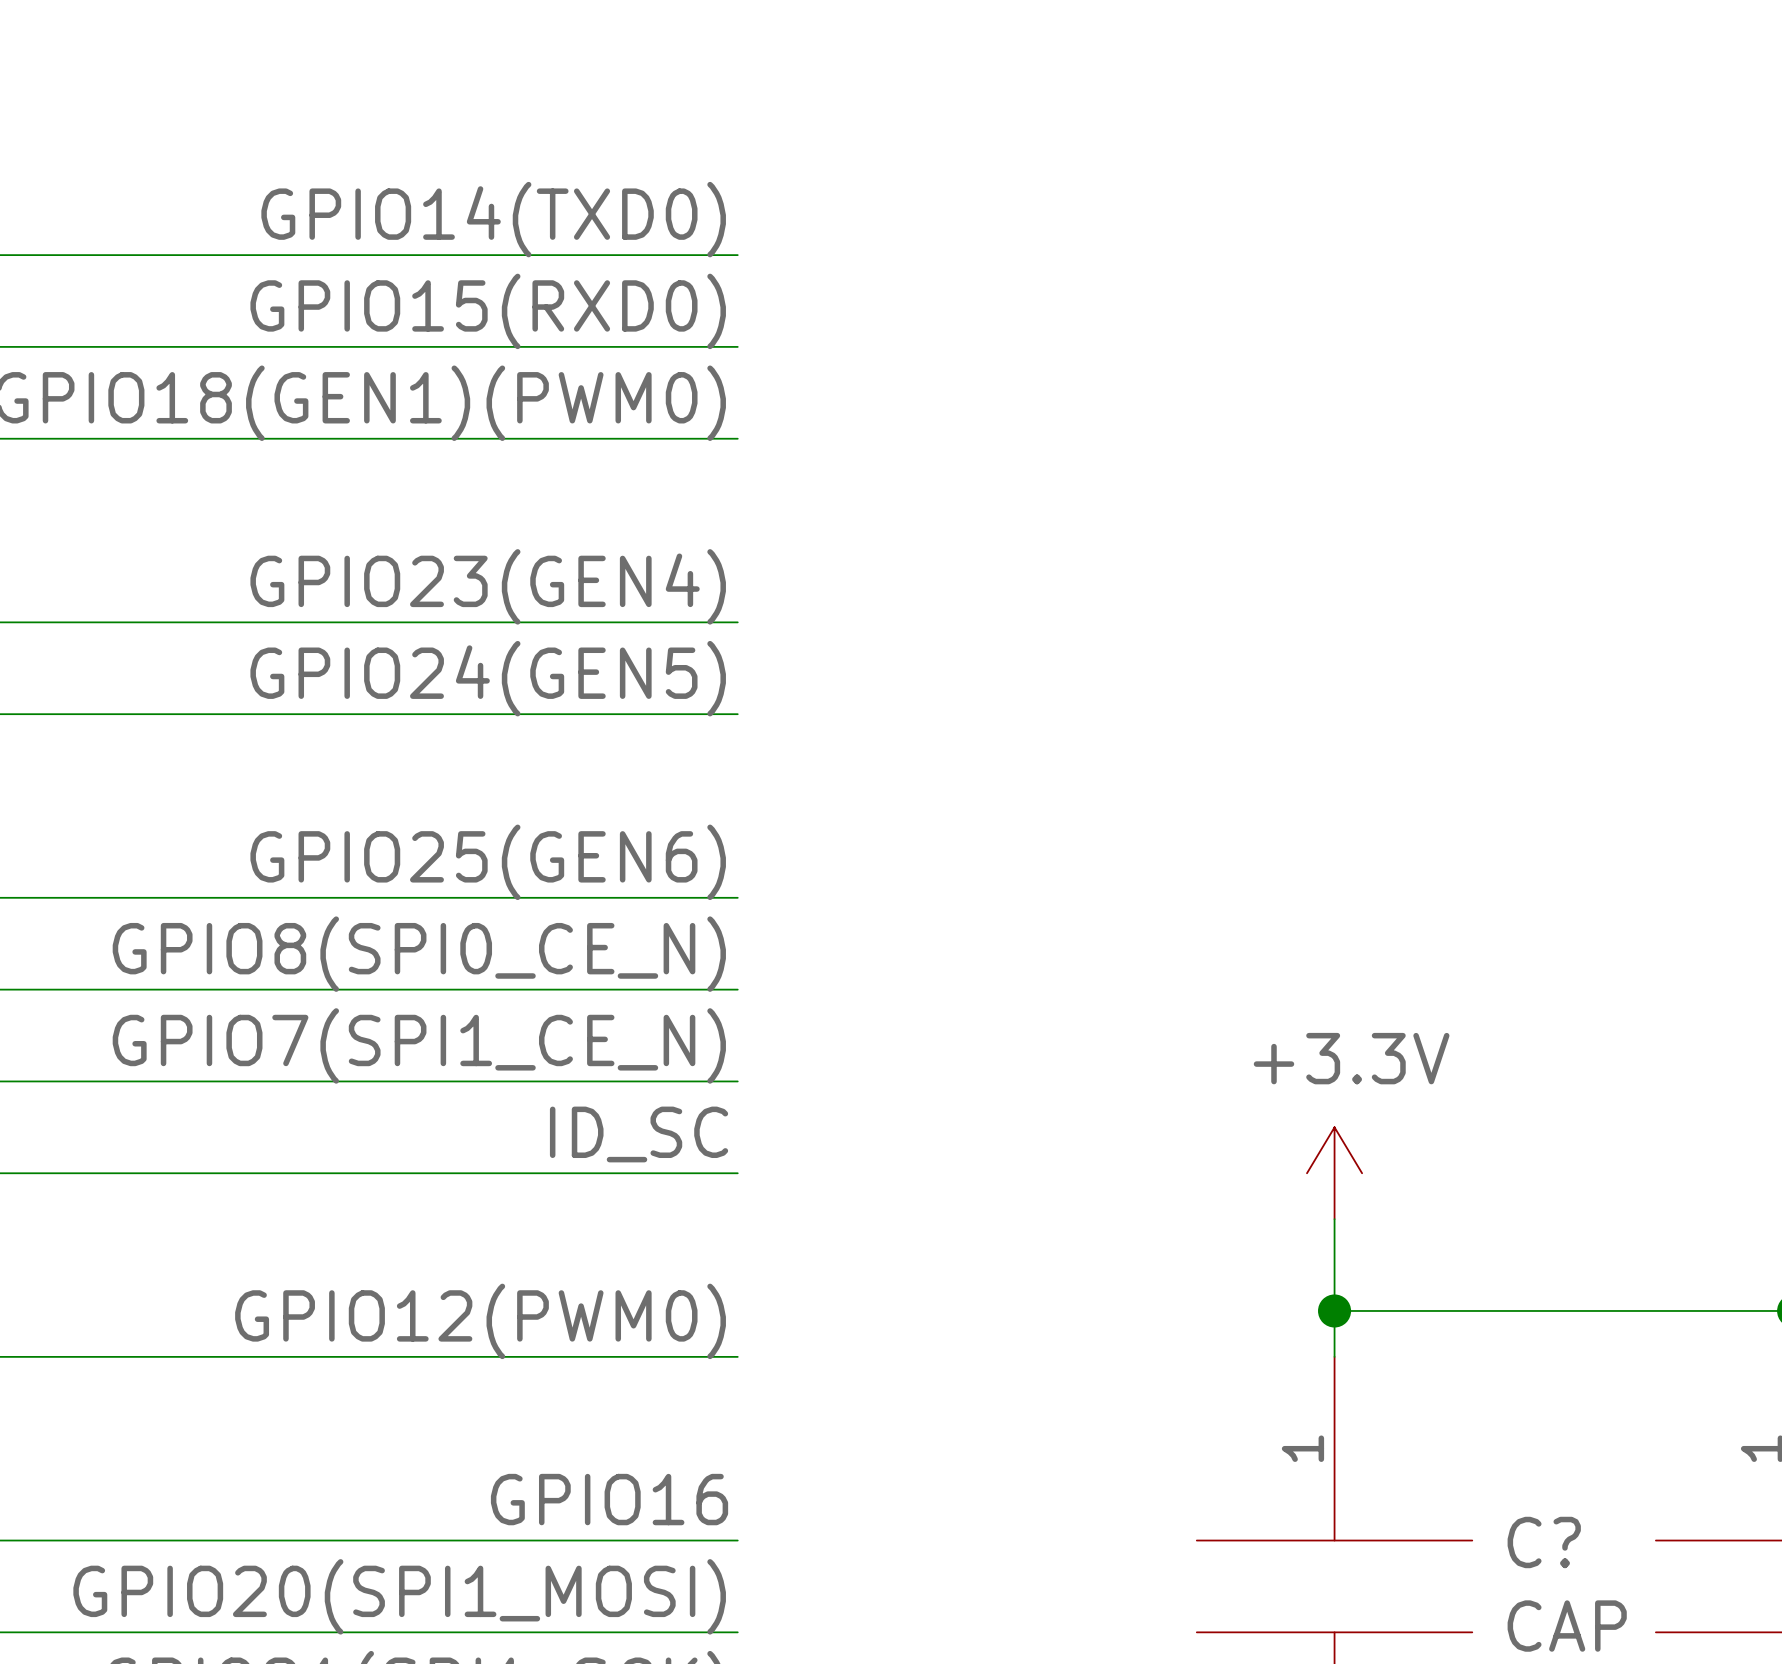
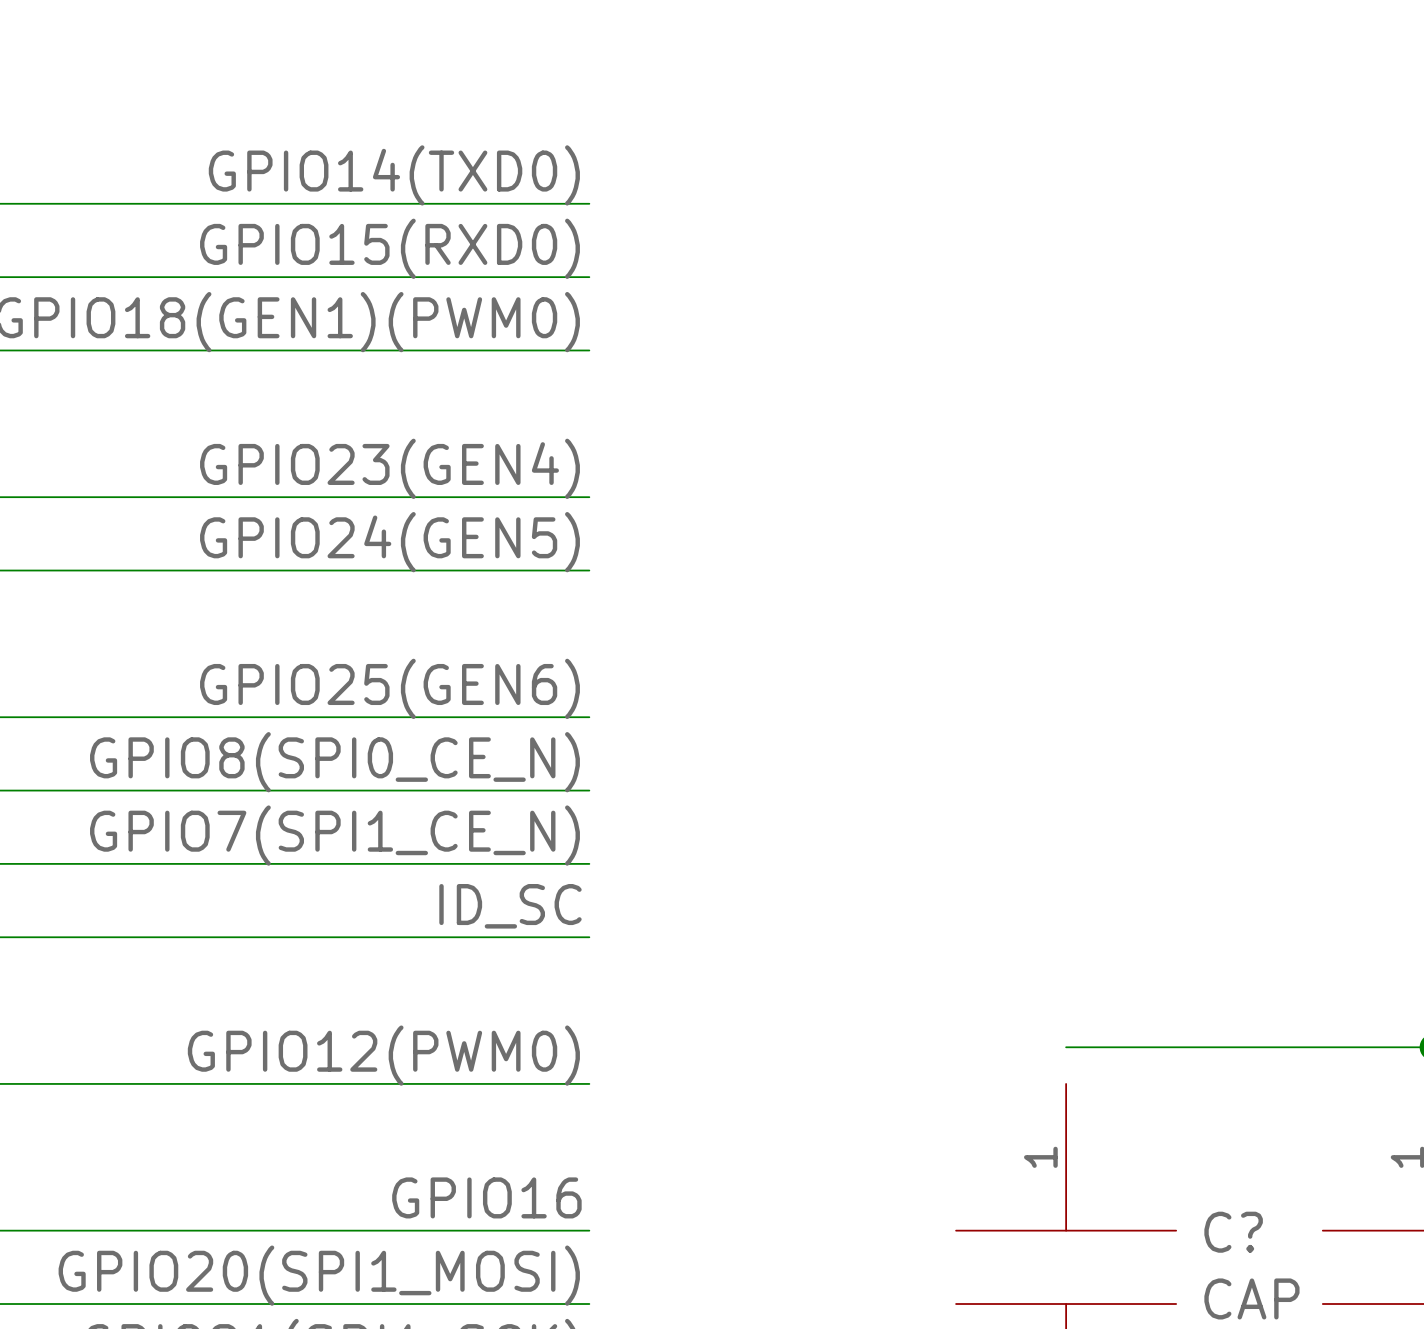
power symbol: +3.3V (1334, 1173) -> none
wire: (1334, 1219) (1334, 1356) -> none
junction: (1334, 1310) -> none

